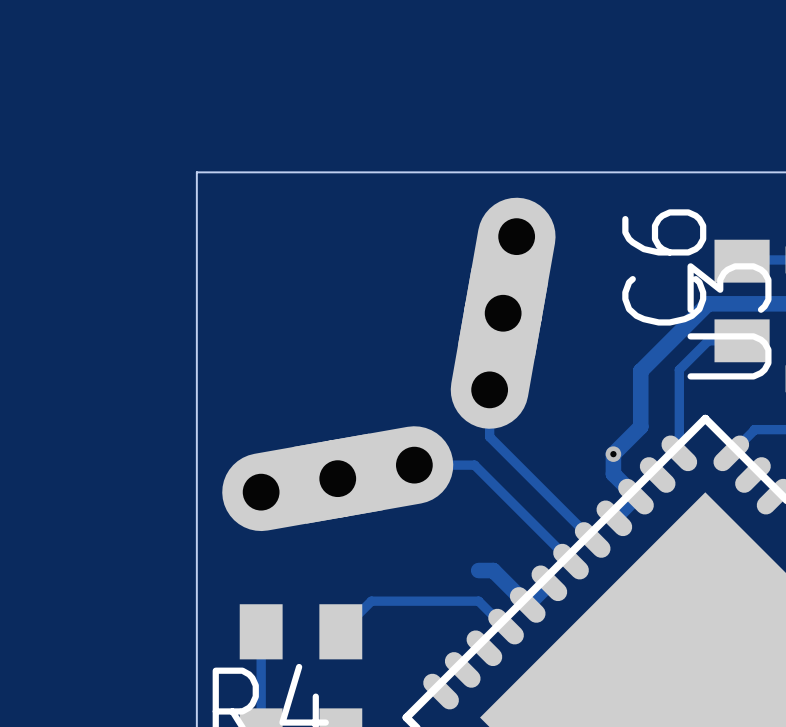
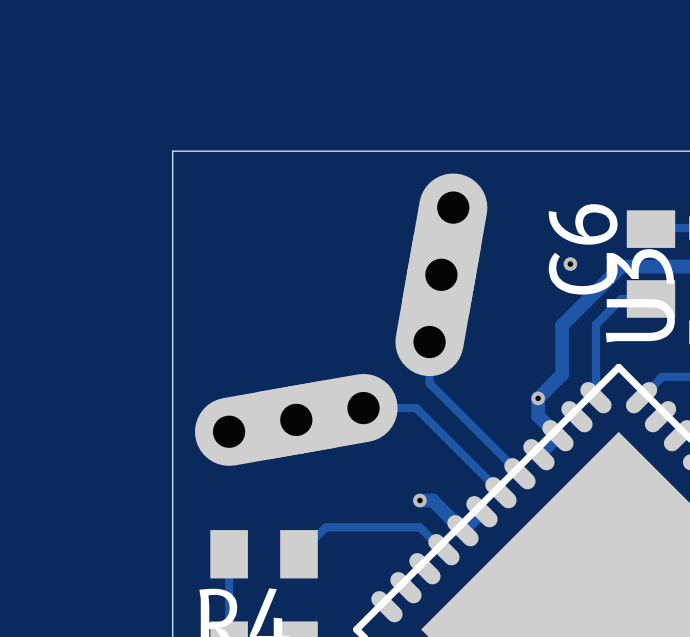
via: none -> (570, 264)
via: none -> (419, 500)

